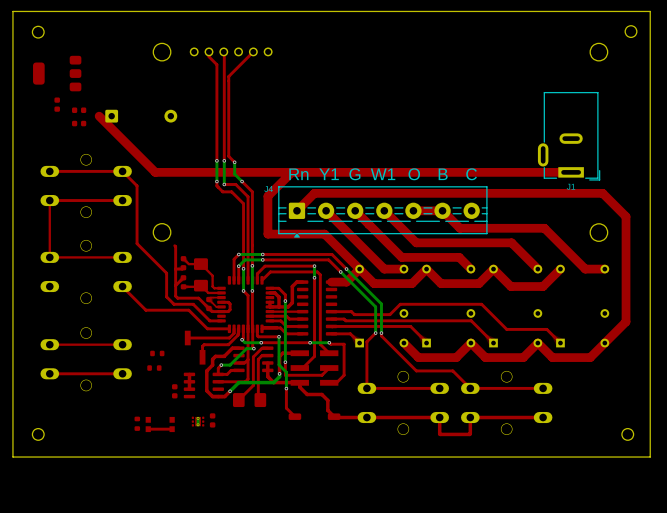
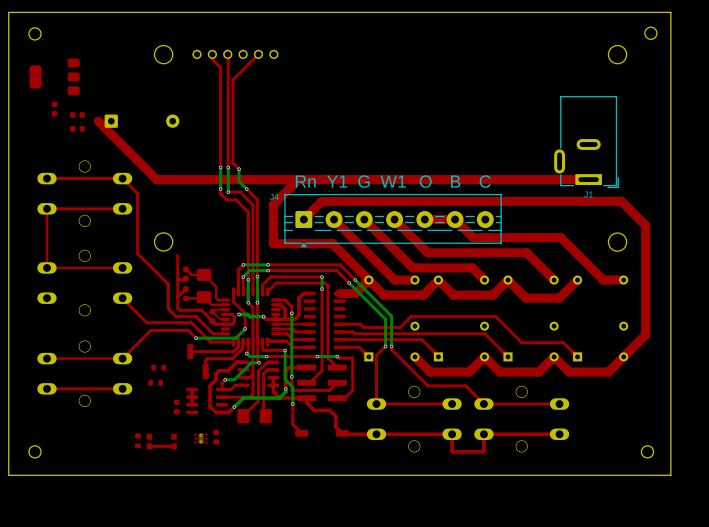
top track: none -> (233, 291) (233, 301) (245, 313) (245, 328)
bottom track: none -> (239, 314) (263, 316)
via: none -> (239, 314)
top track: none -> (263, 316) (266, 319) (275, 319)
via: none -> (263, 316)
bottom track: none -> (245, 328) (235, 338) (196, 338)
via: none -> (245, 328)
top track: none -> (196, 338) (188, 330) (150, 330) (122, 358)
via: none -> (196, 338)

